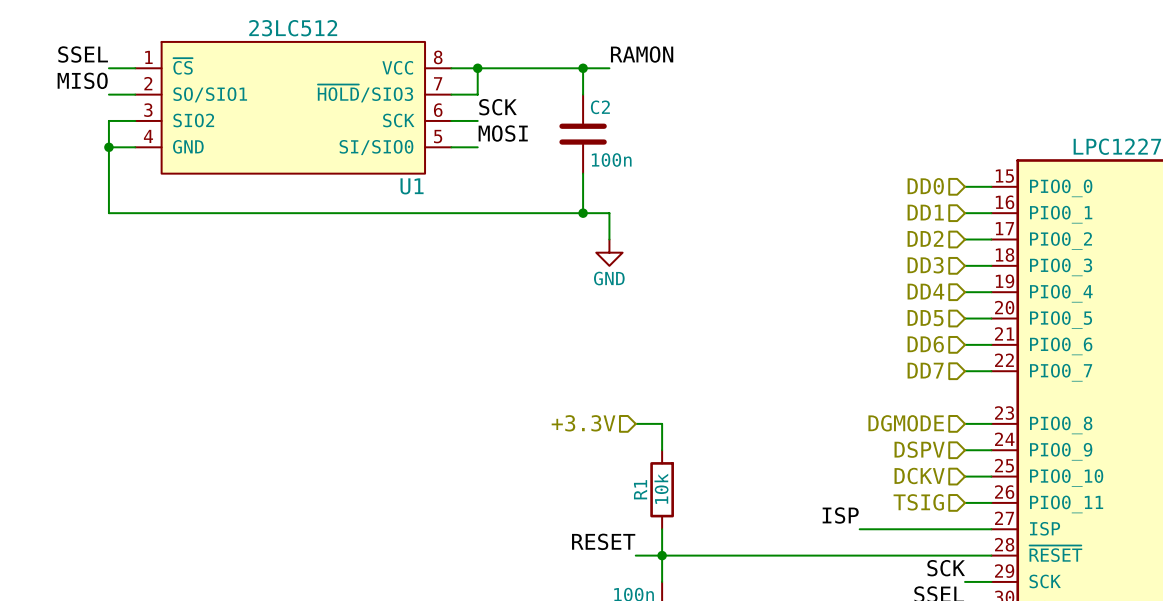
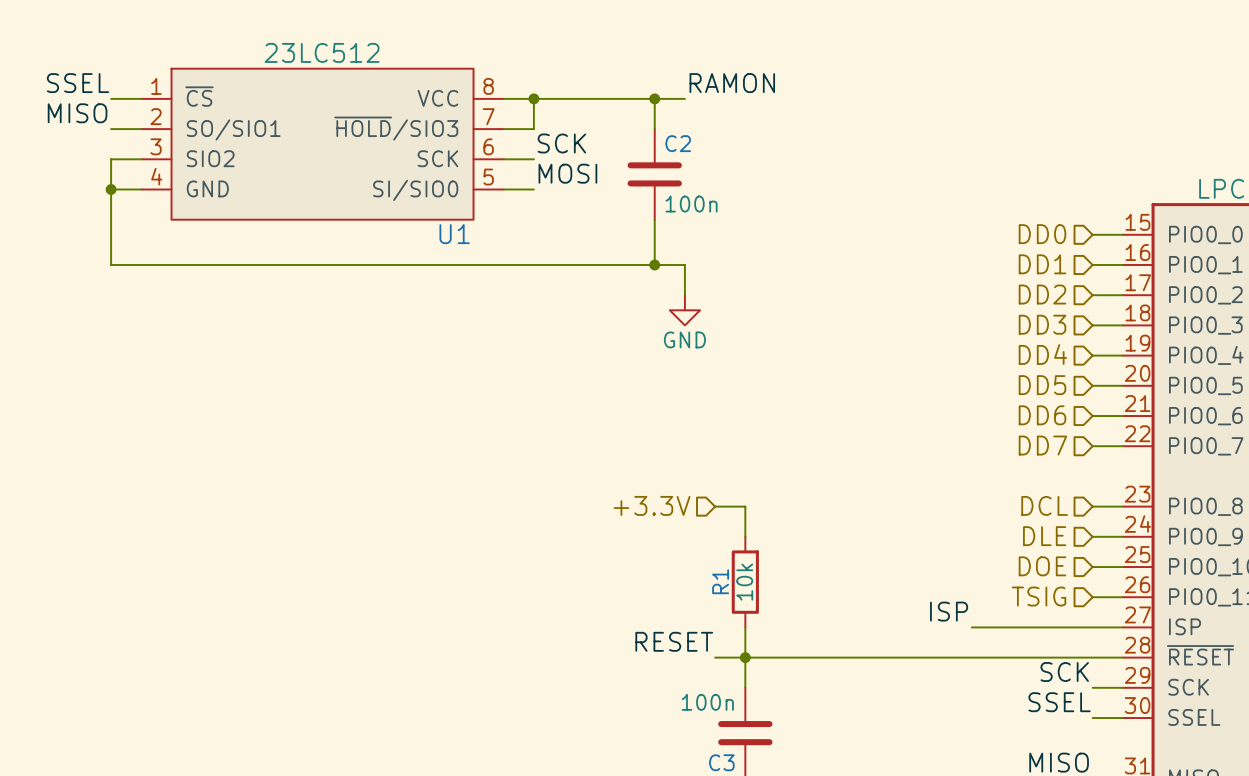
hierarchical label: DGMODE (906, 423) -> DCL (1044, 505)
hierarchical label: DSPV (919, 449) -> DLE (1044, 536)
hierarchical label: DCKV (919, 476) -> DOE (1042, 566)

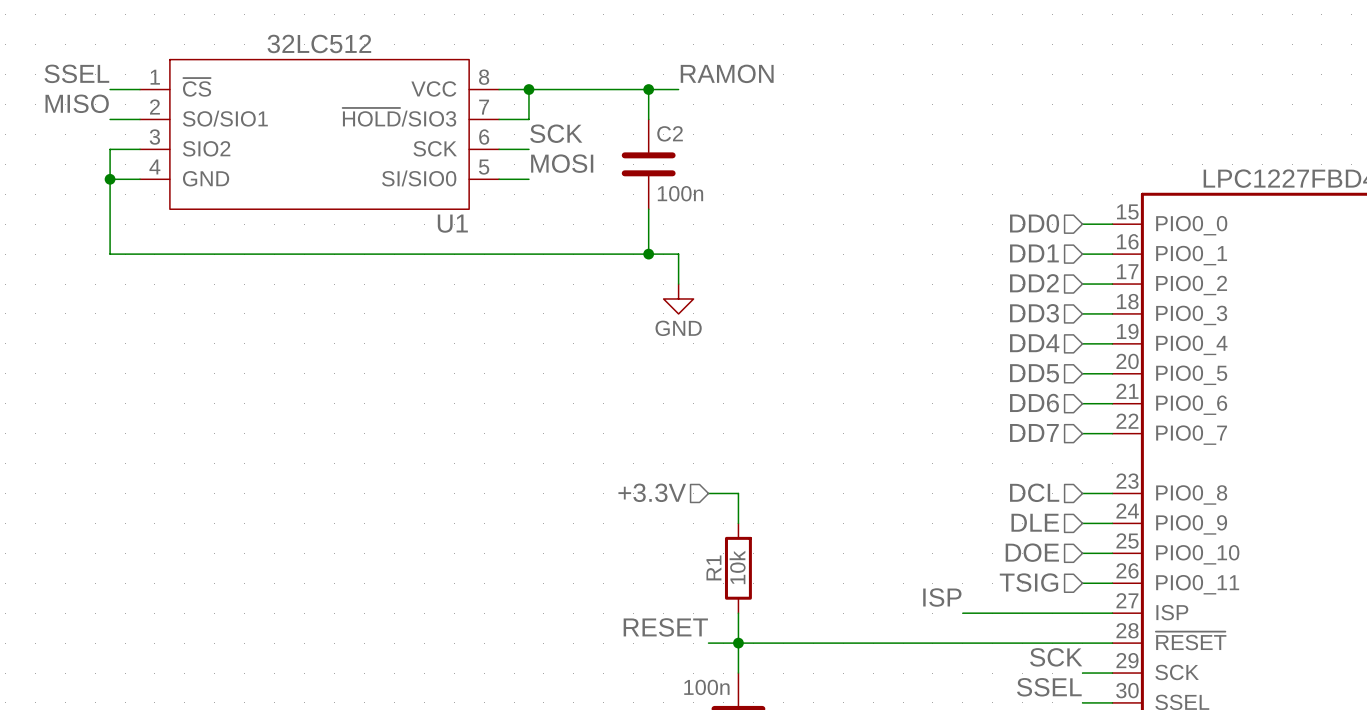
U1 value: 23LC512 (322, 52) -> 32LC512 (319, 43)

